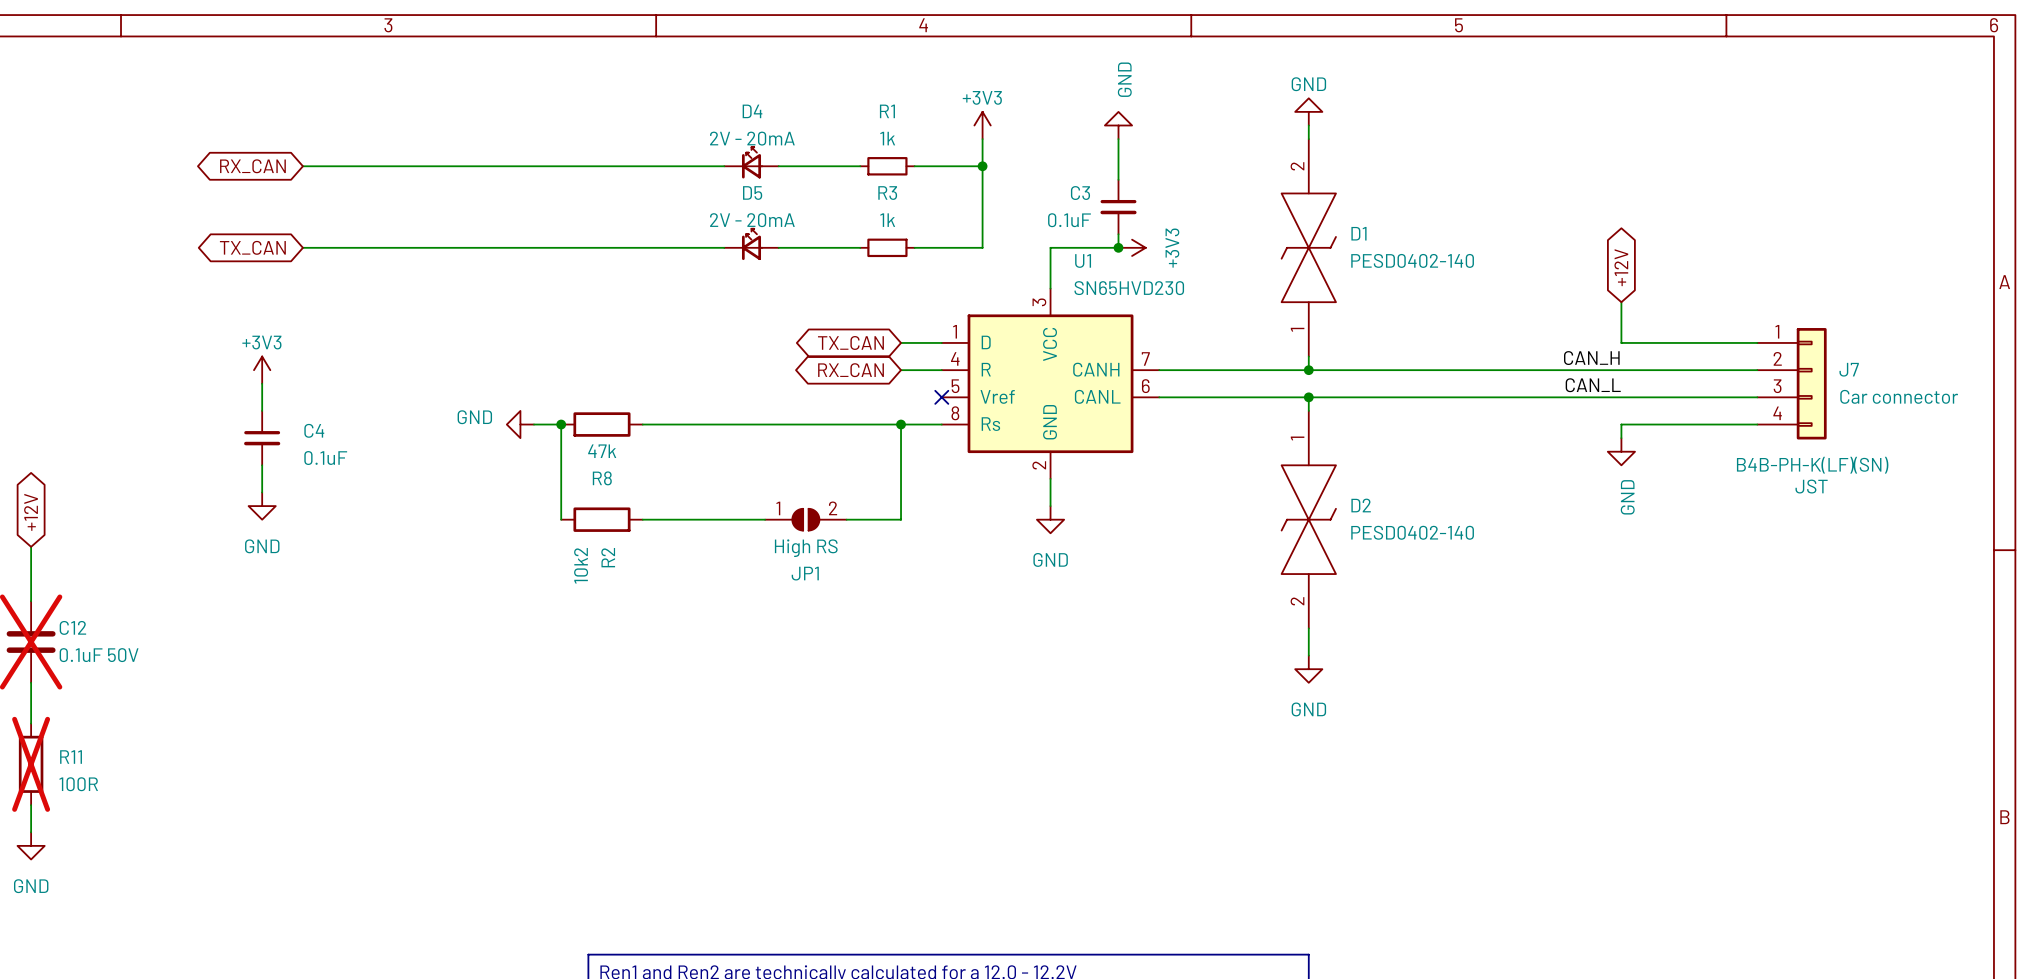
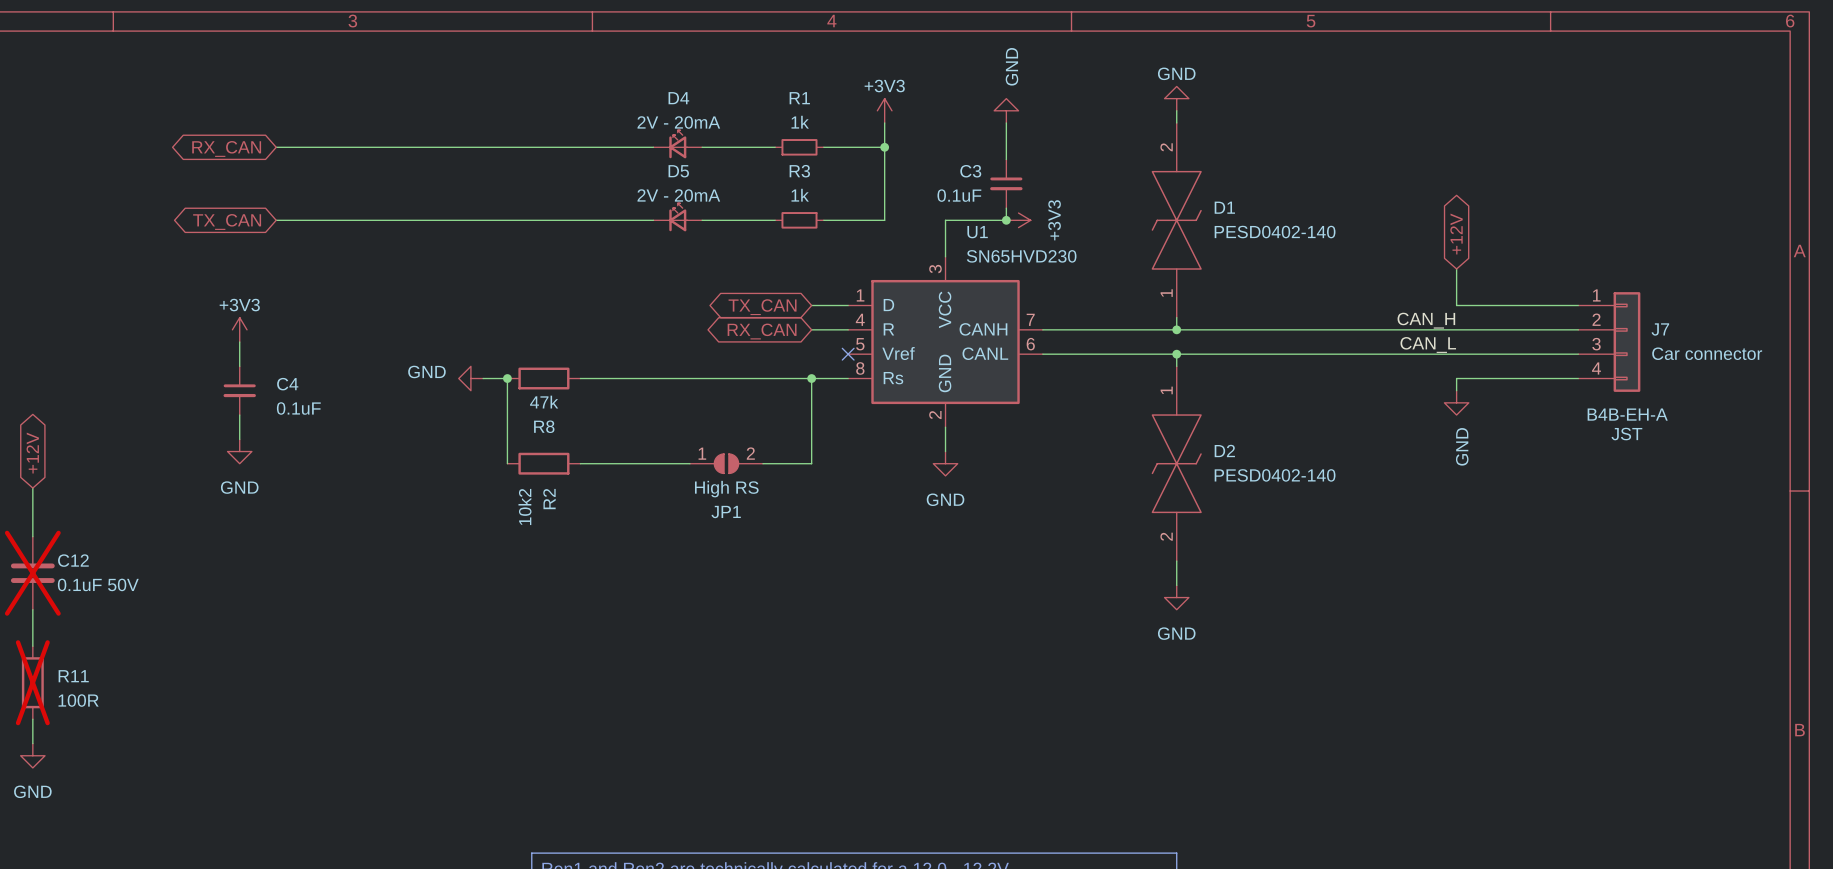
J7 text: B4B-PH-K(LF)(SN) (1812, 465) -> B4B-EH-A (1627, 414)

